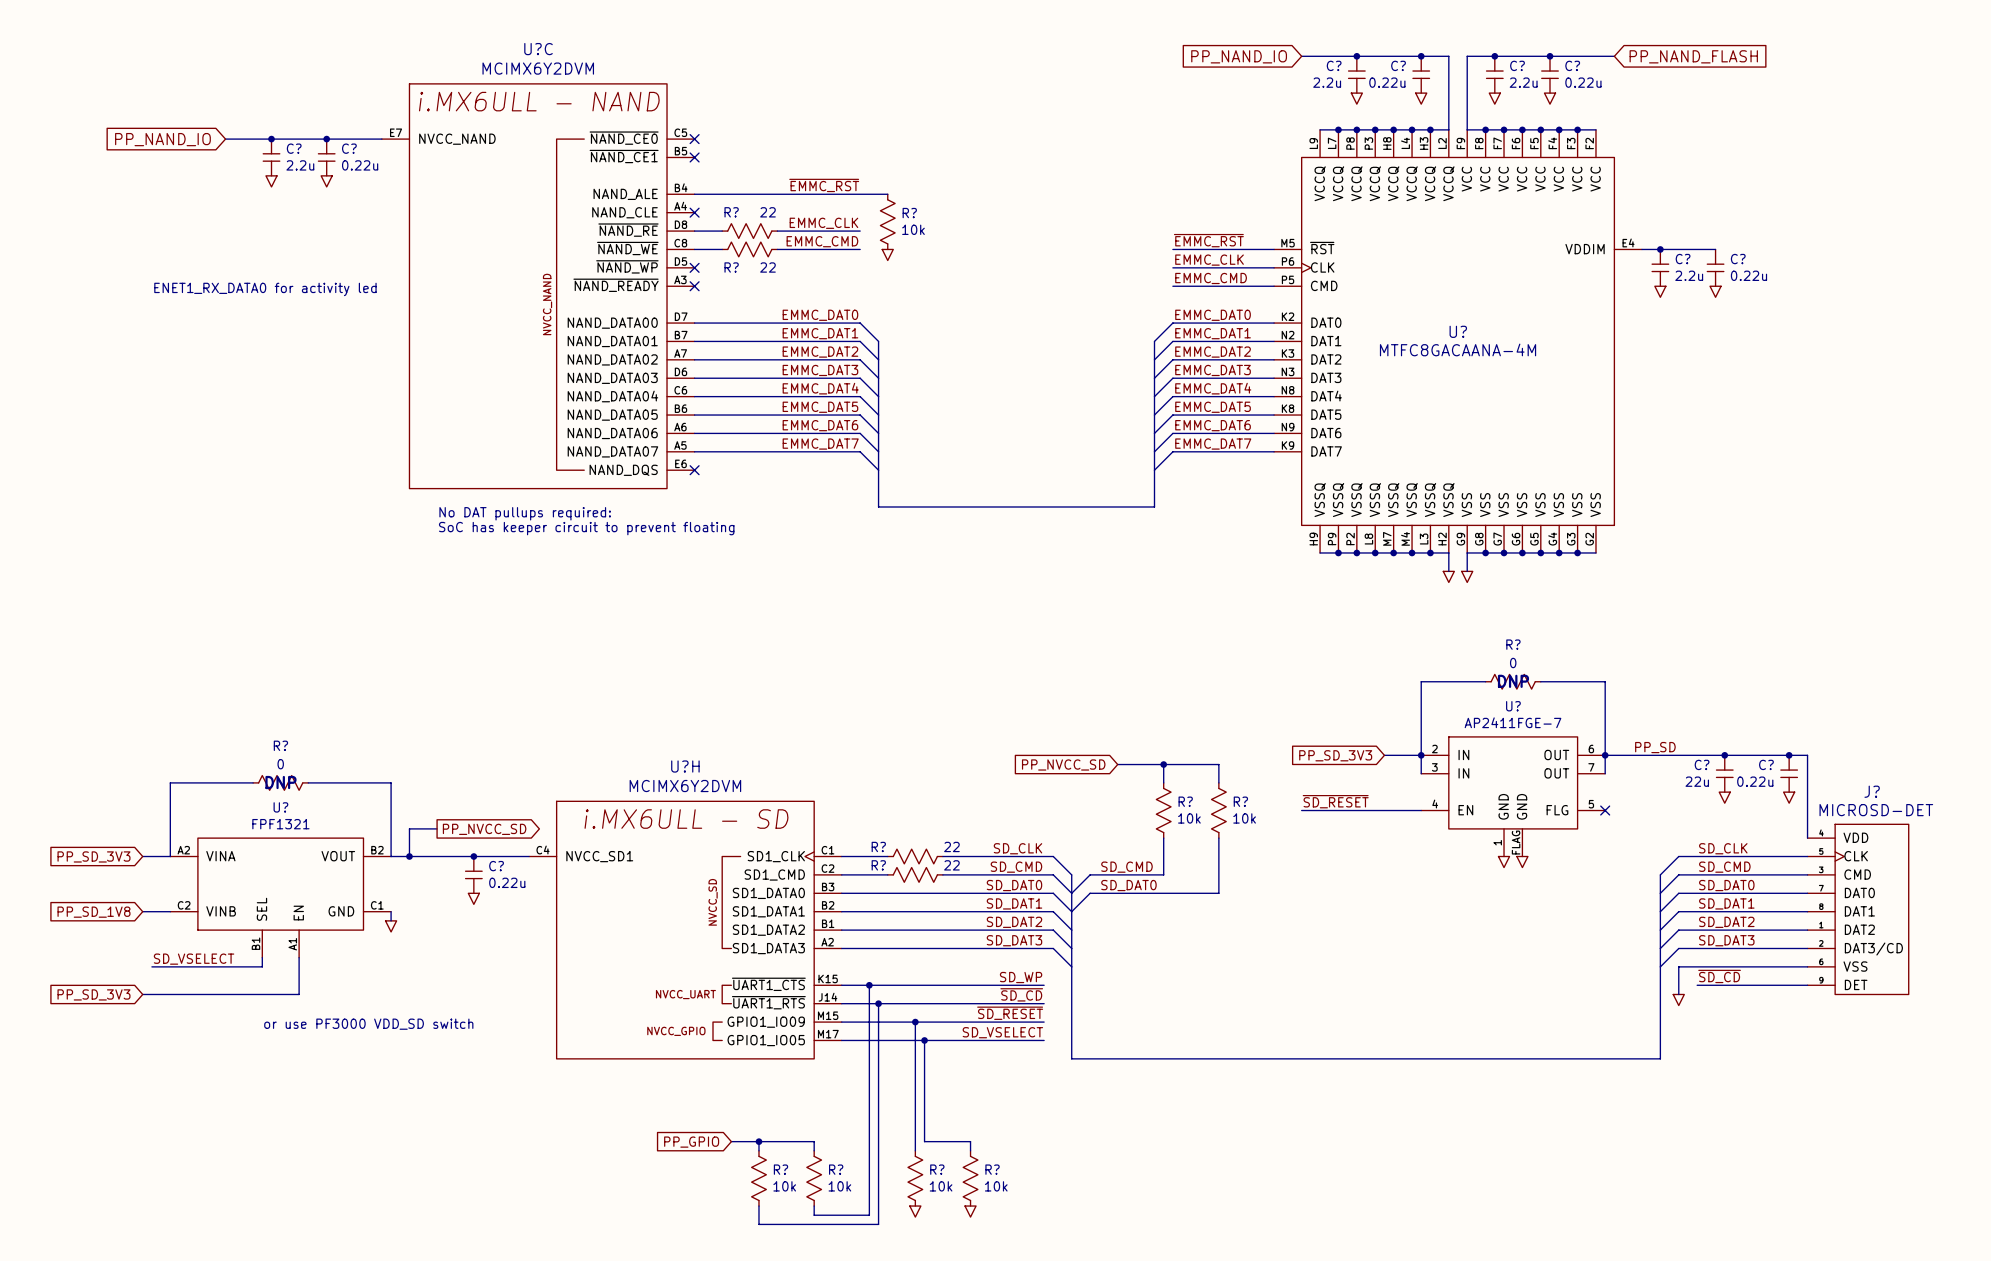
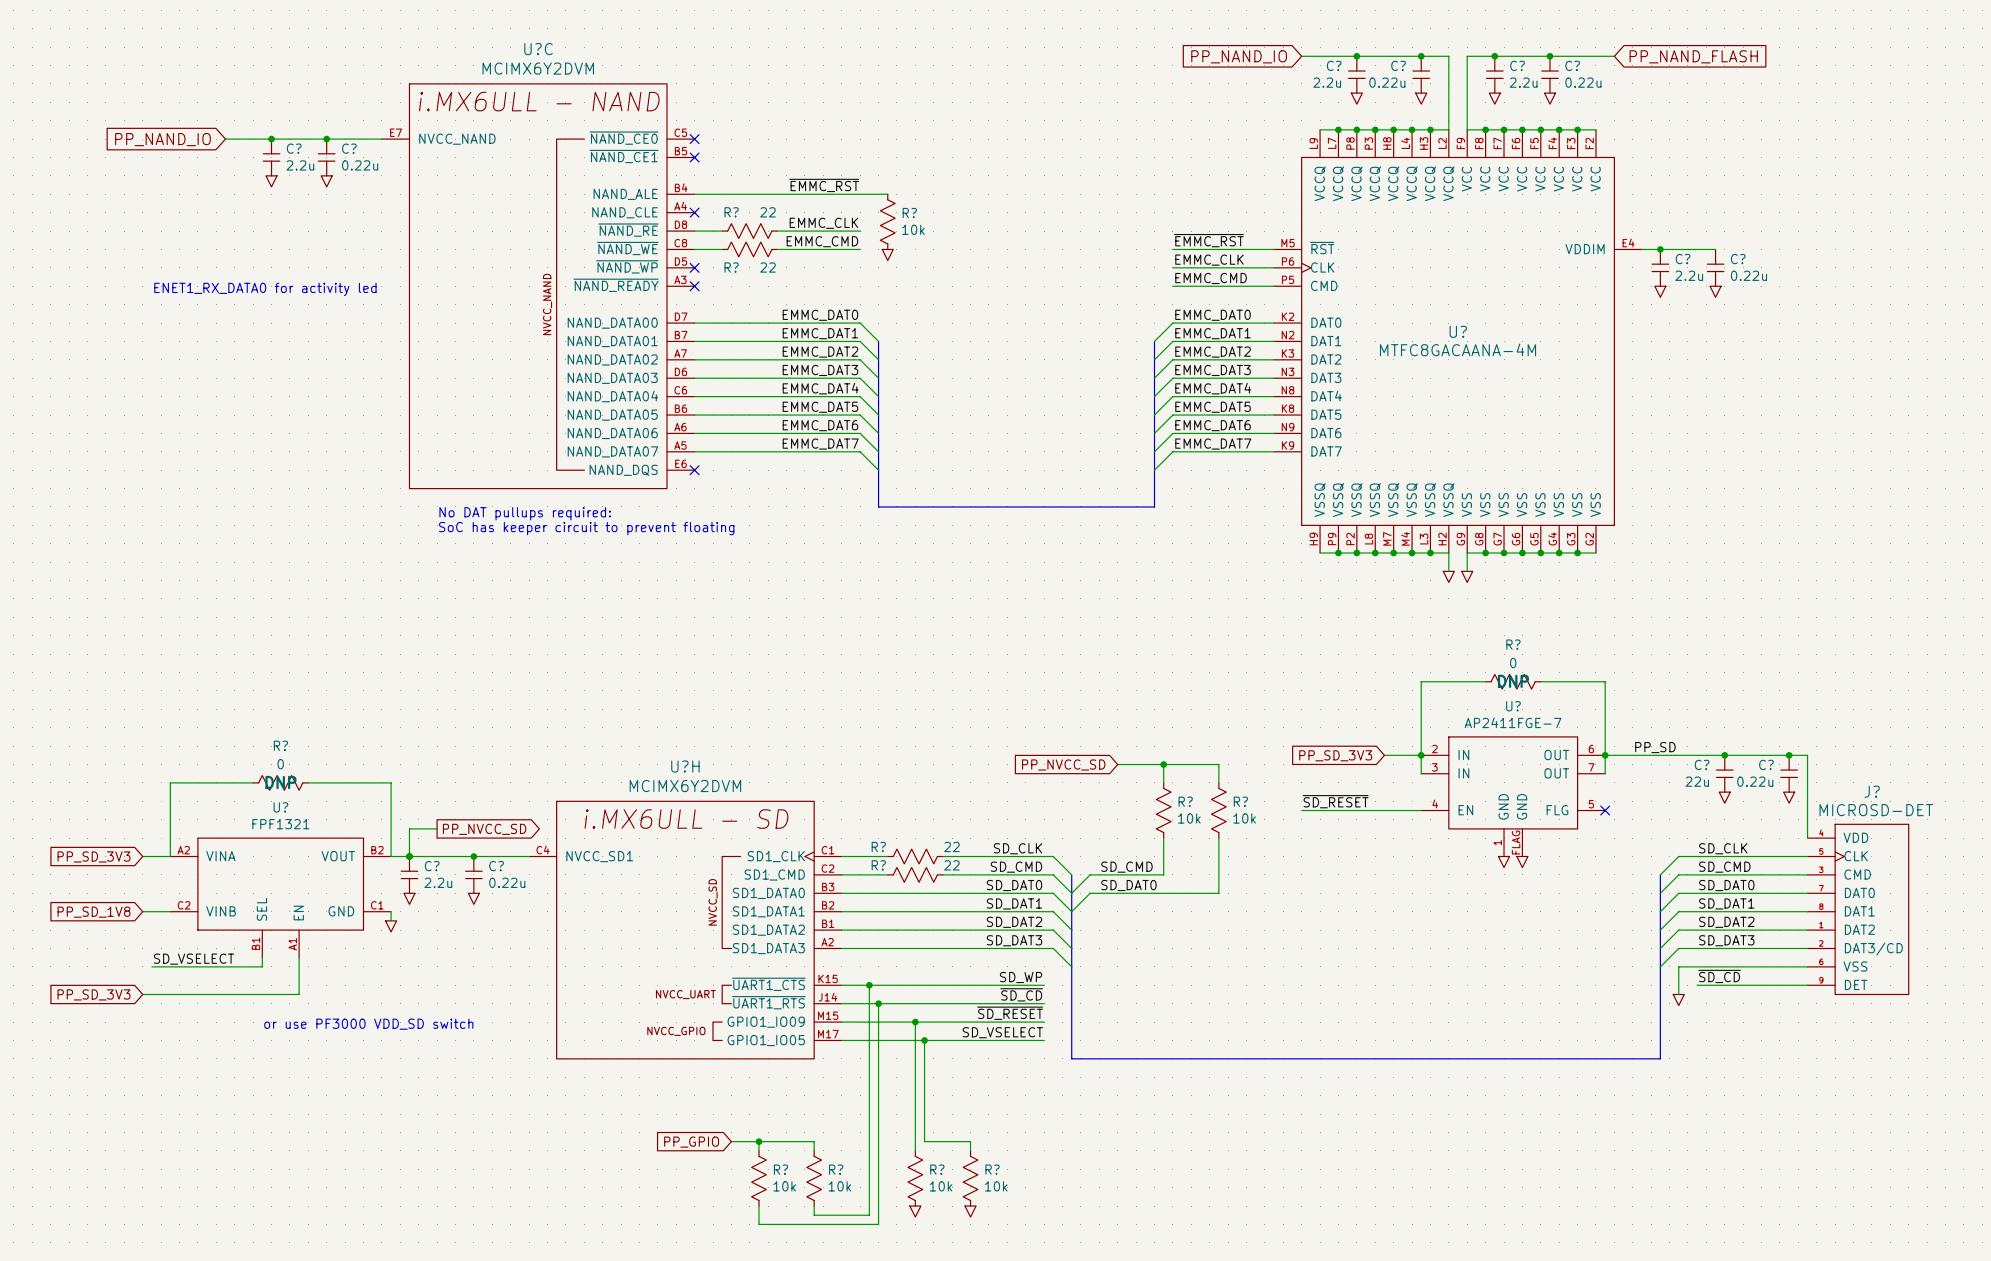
C?: none -> 2.2u (409, 874)
power symbol: none -> (409, 898)

